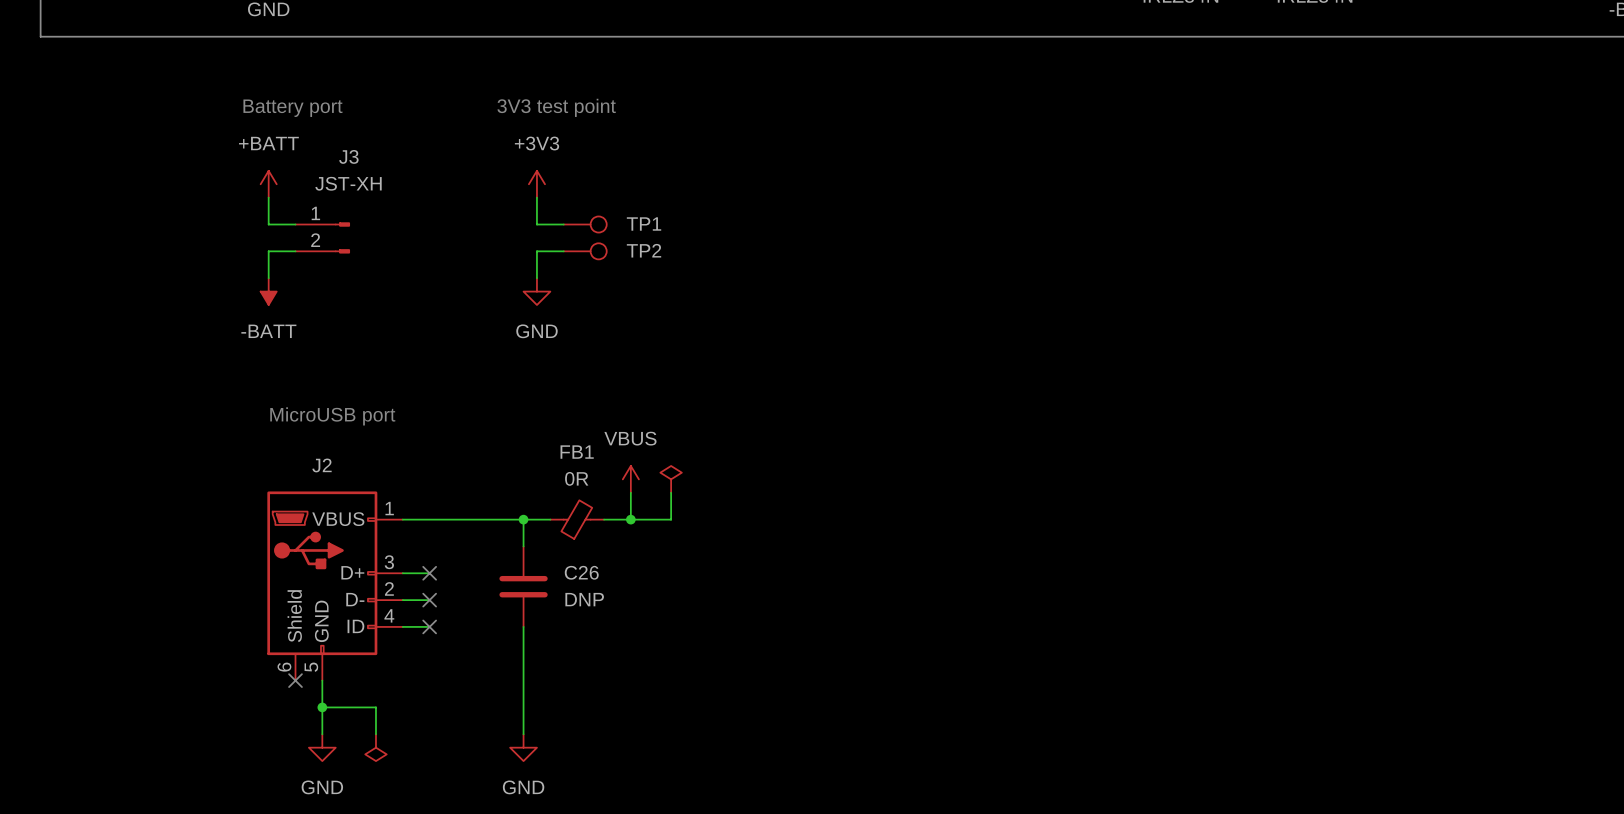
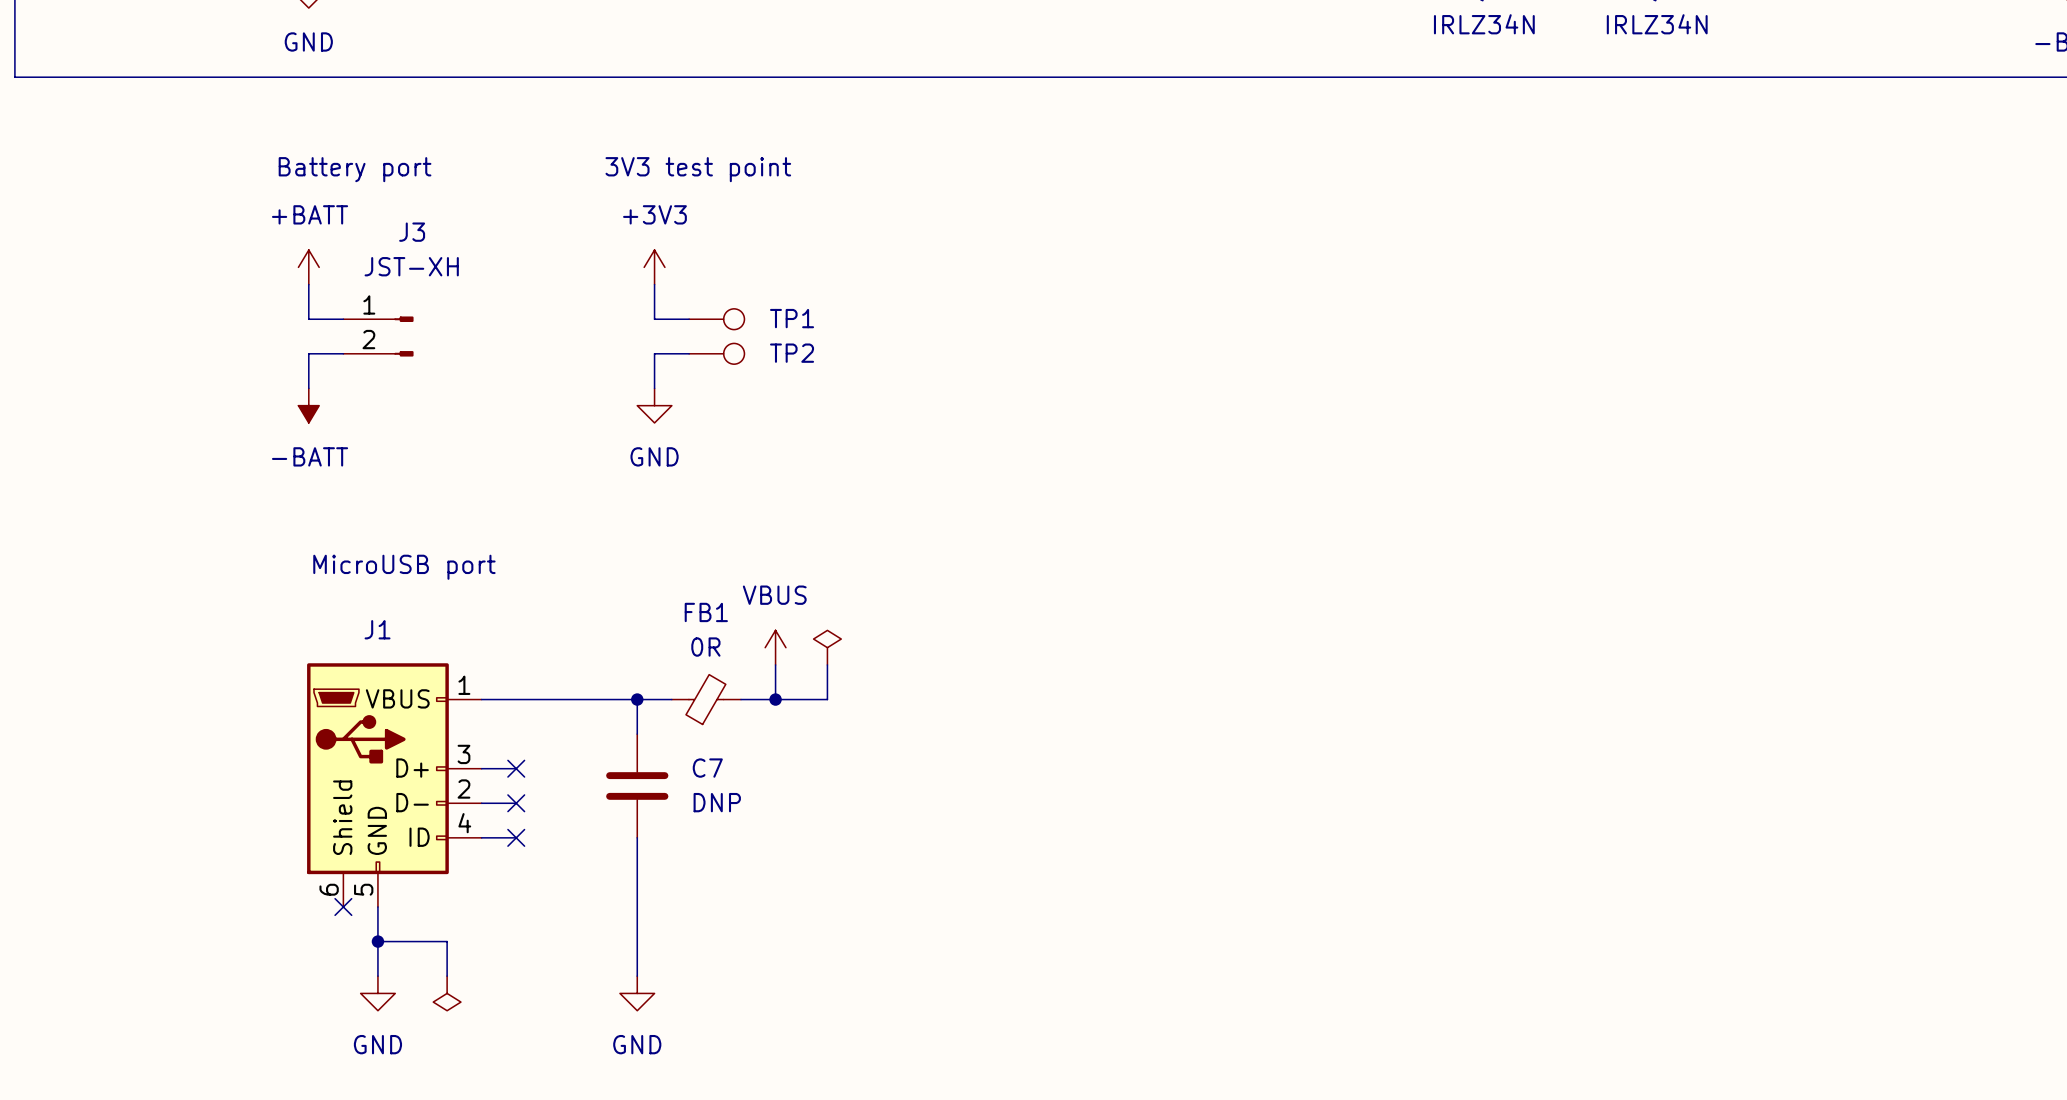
J2 name: J2 (321, 465) -> J1 (377, 629)
C26 name: C26 (581, 572) -> C7 (707, 768)

